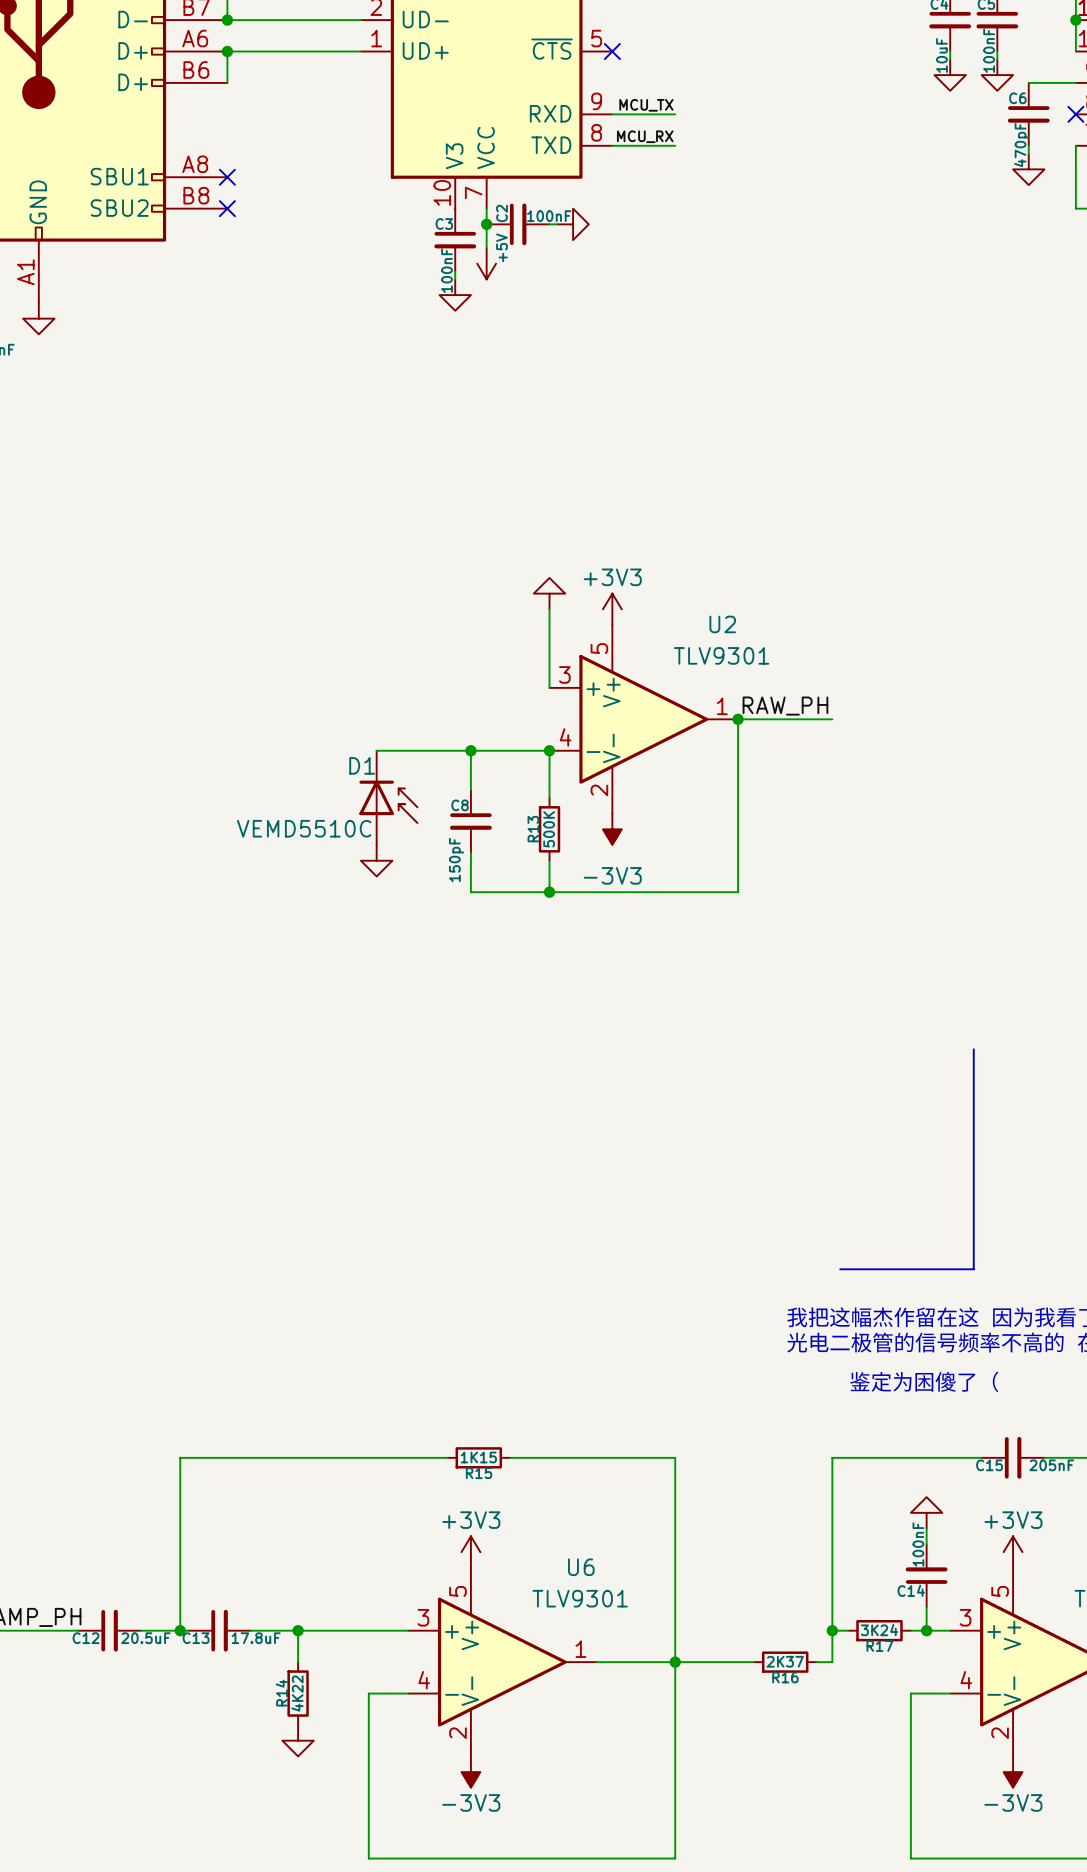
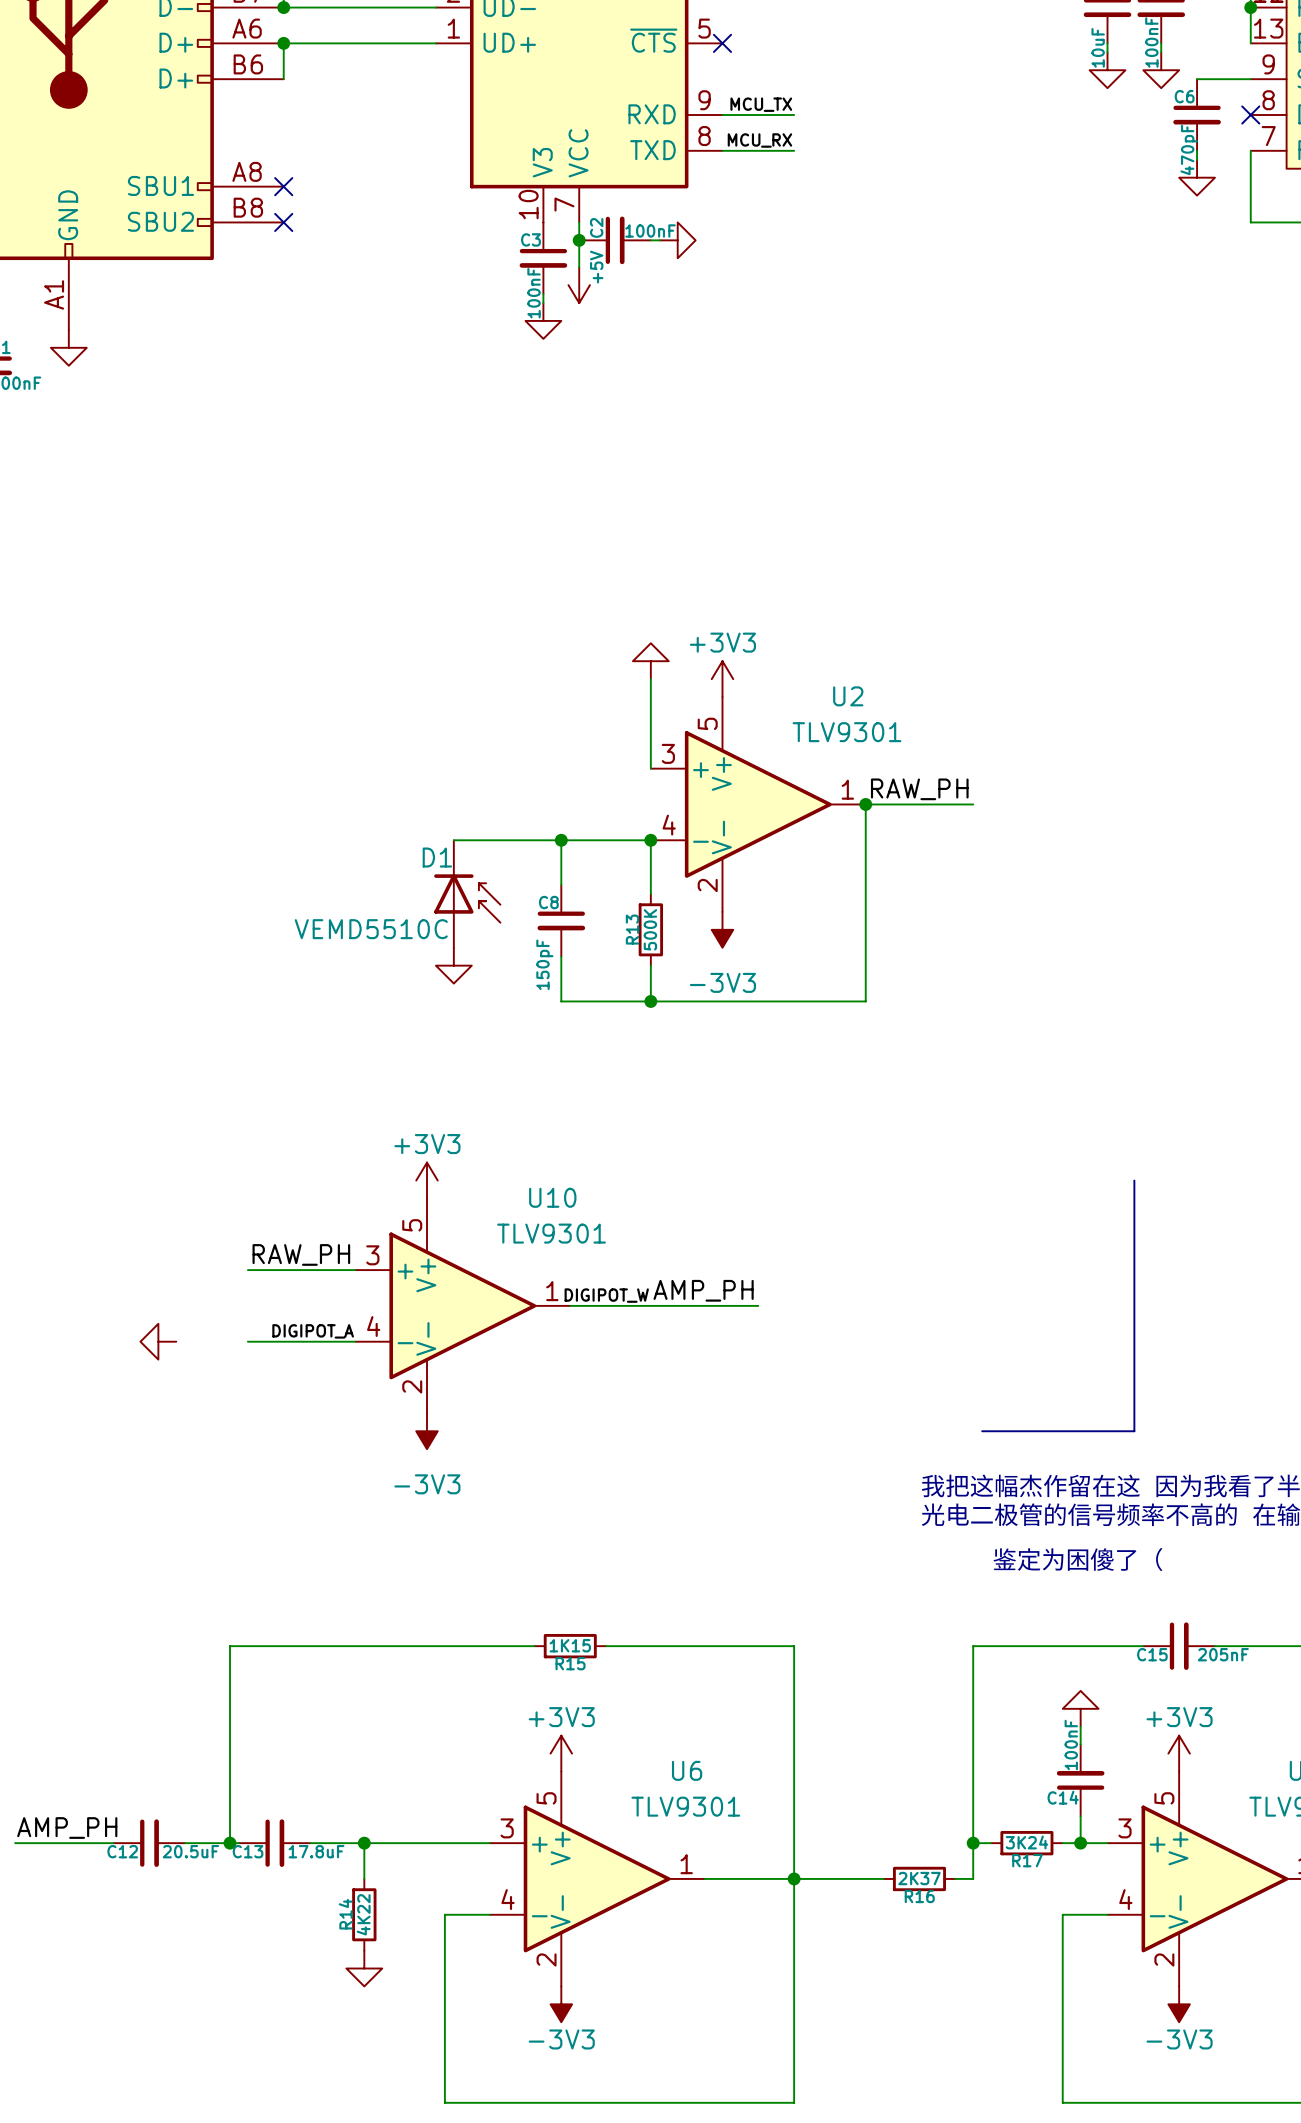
power symbol: none -> +3V3 (427, 1180)
label: none -> RAW_PH (301, 1254)
wire: none -> (247, 1270) (355, 1270)
label: none -> AMP_PH (703, 1290)
label: none -> DIGIPOT_W (606, 1295)
U10: none -> TLV9301 (462, 1305)
wire: none -> (570, 1305) (758, 1305)
label: none -> DIGIPOT_A (313, 1331)
power symbol: none -> (158, 1341)
wire: none -> (247, 1341) (355, 1341)
power symbol: none -> -3V3 (427, 1431)

